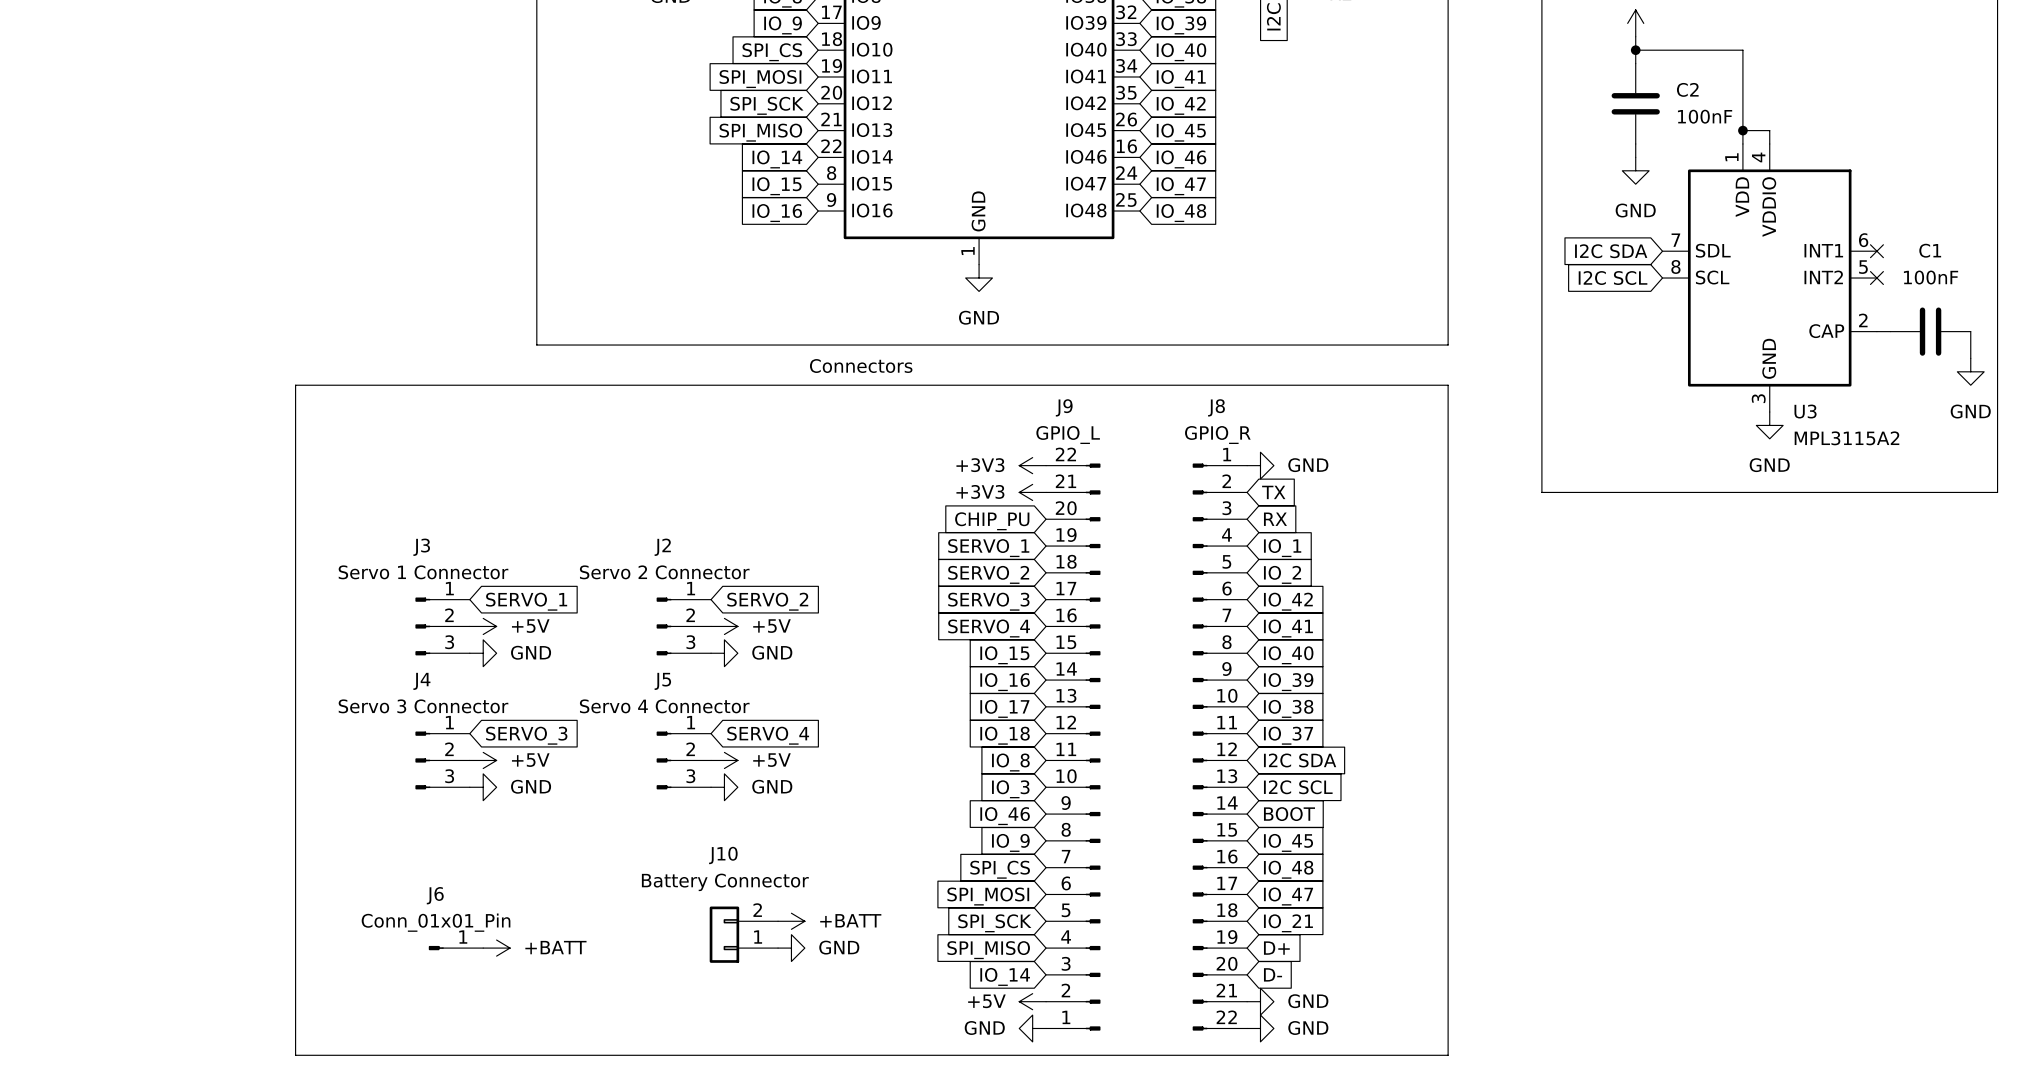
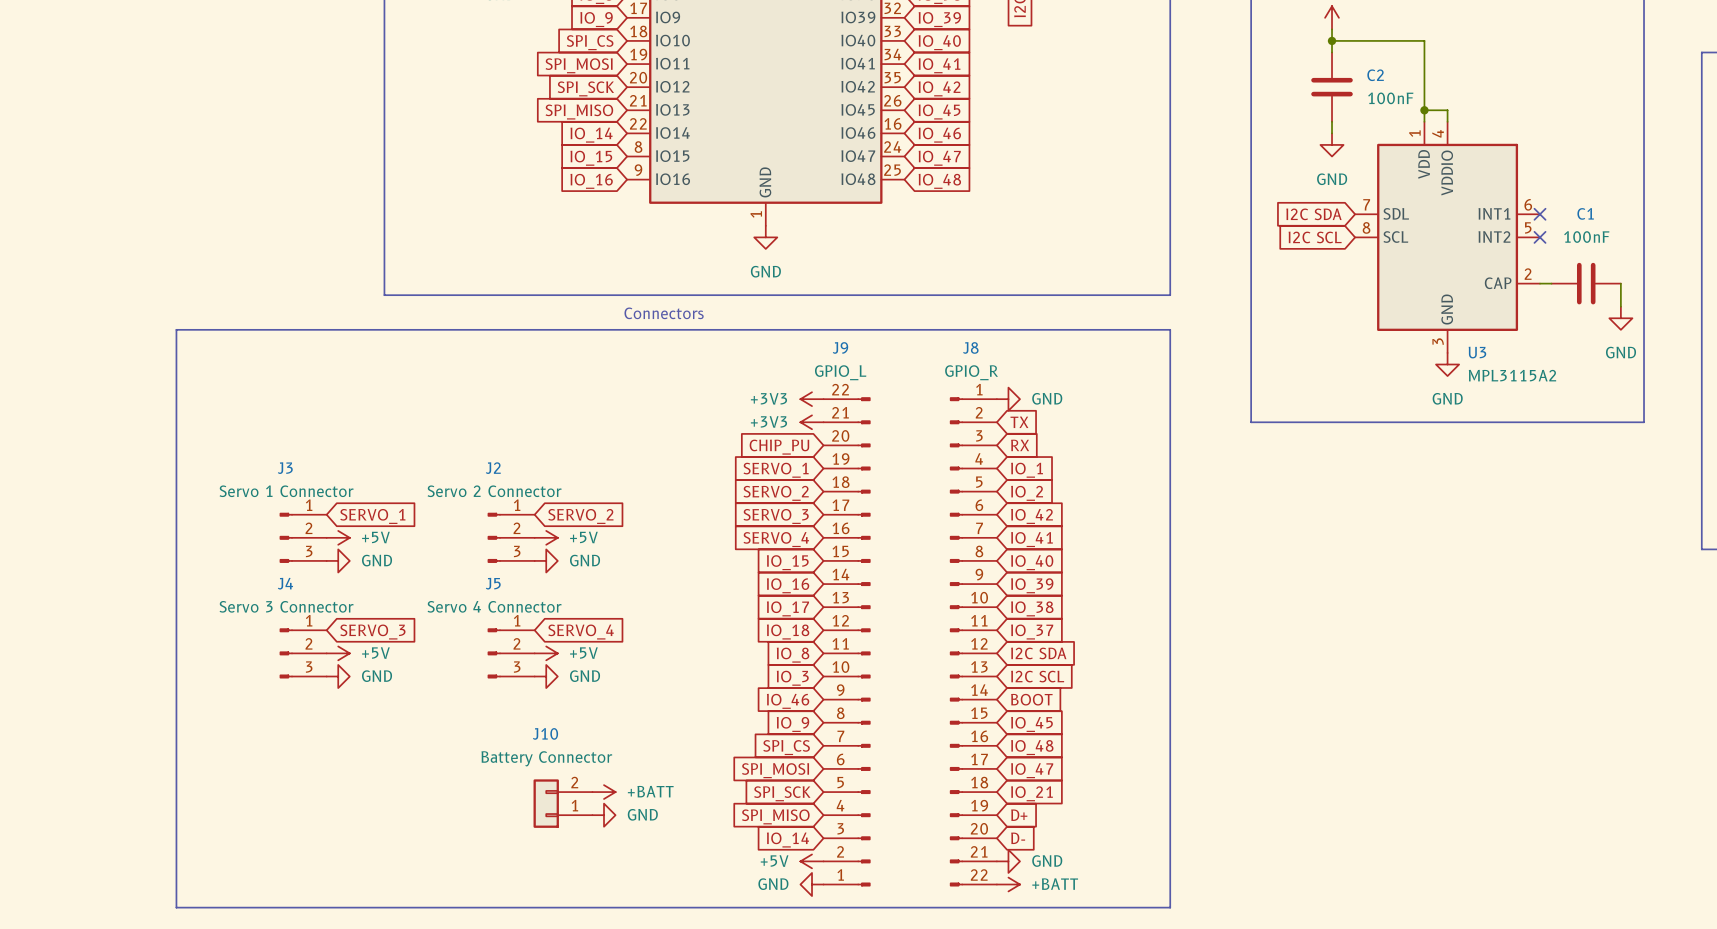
J6: Conn_01x01_Pin (456, 948) -> none
power symbol: +BATT (496, 948) -> none
power symbol: GND (1260, 1028) -> +BATT (1008, 884)

